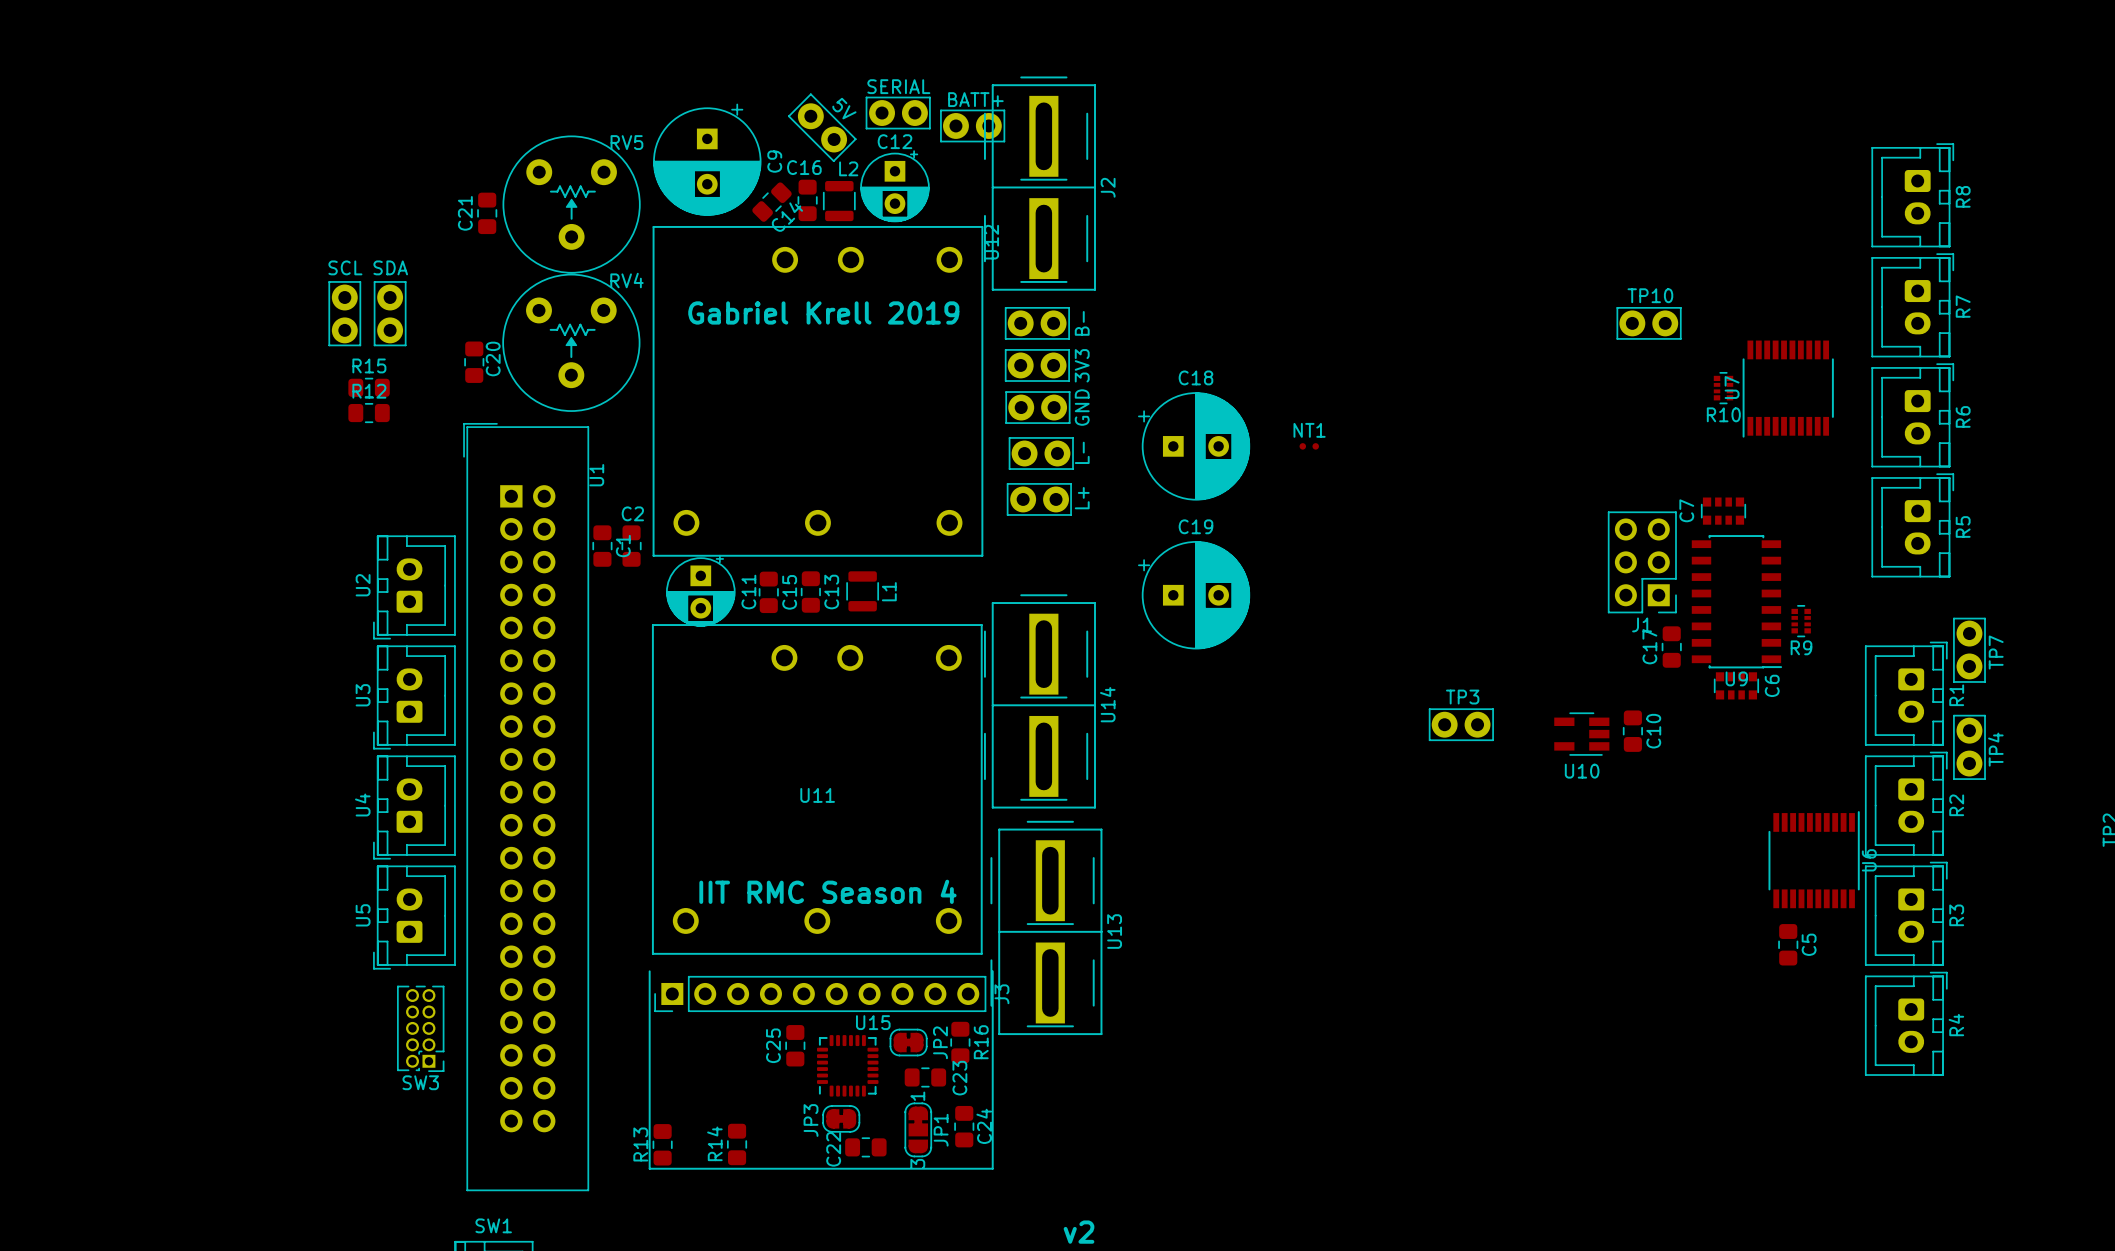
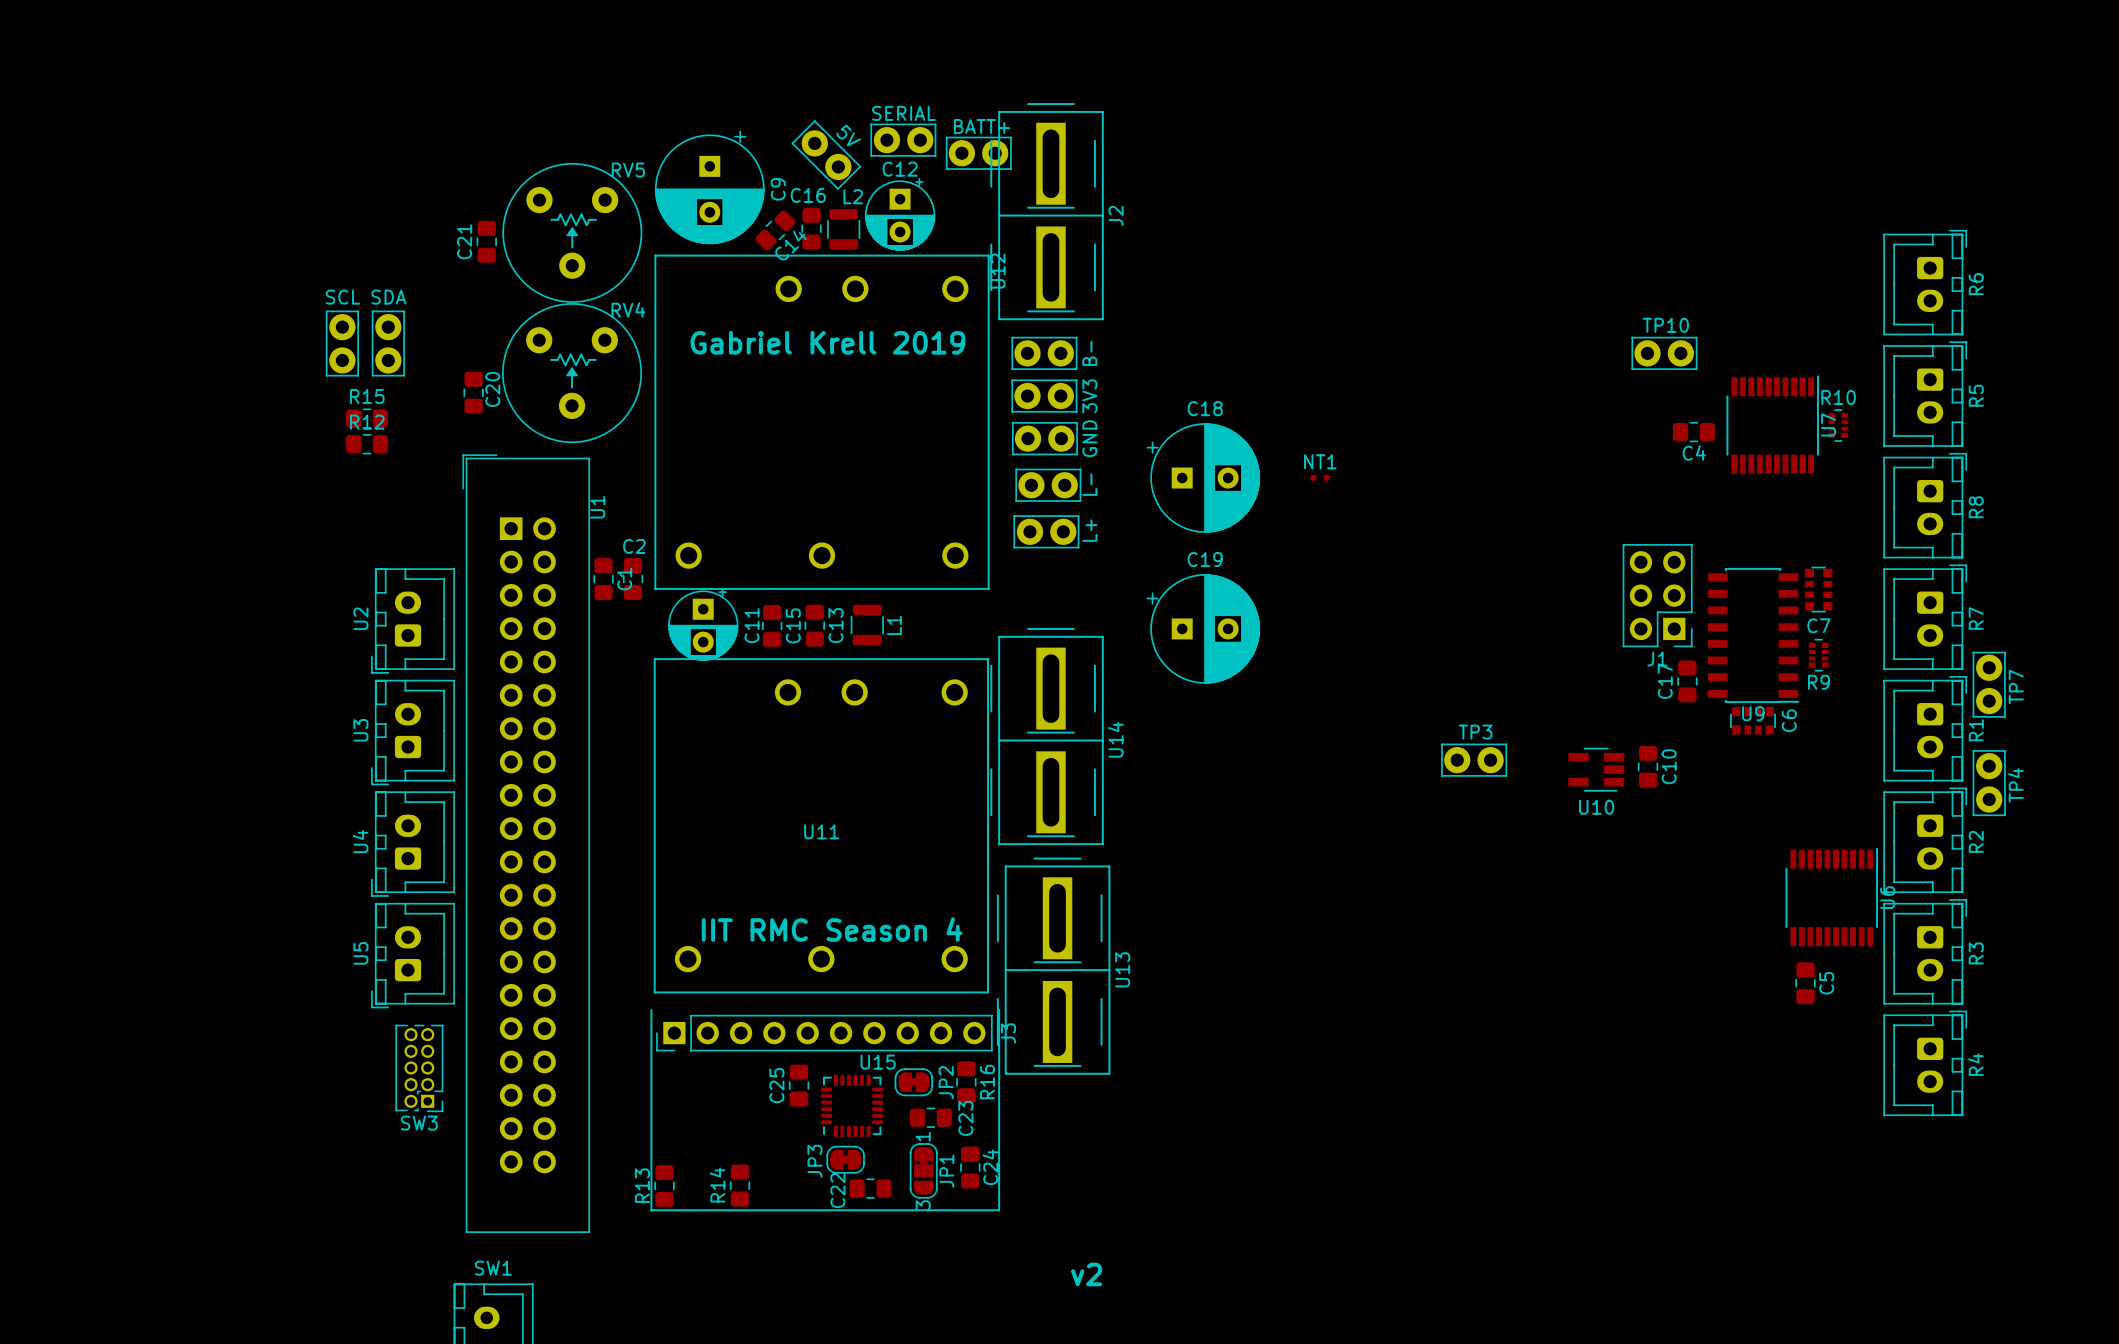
R8 position: (1912, 195) -> (1925, 505)
R7 position: (1912, 305) -> (1925, 617)
R10 position: (1723, 388) -> (1838, 425)
U7 rotation: 0° (1788, 389) -> 180° (1772, 424)
C4: none -> (1693, 432)
R10 name position: R10 (1723, 414) -> R10 (1838, 397)
R6 position: (1912, 415) -> (1925, 282)
C7 name position: C7 (1686, 510) -> C7 (1818, 625)
C7 rotation: 0° (1723, 511) -> 90° clockwise (1818, 589)
C7 position: (1723, 511) -> (1818, 589)
R5 position: (1912, 525) -> (1925, 394)

